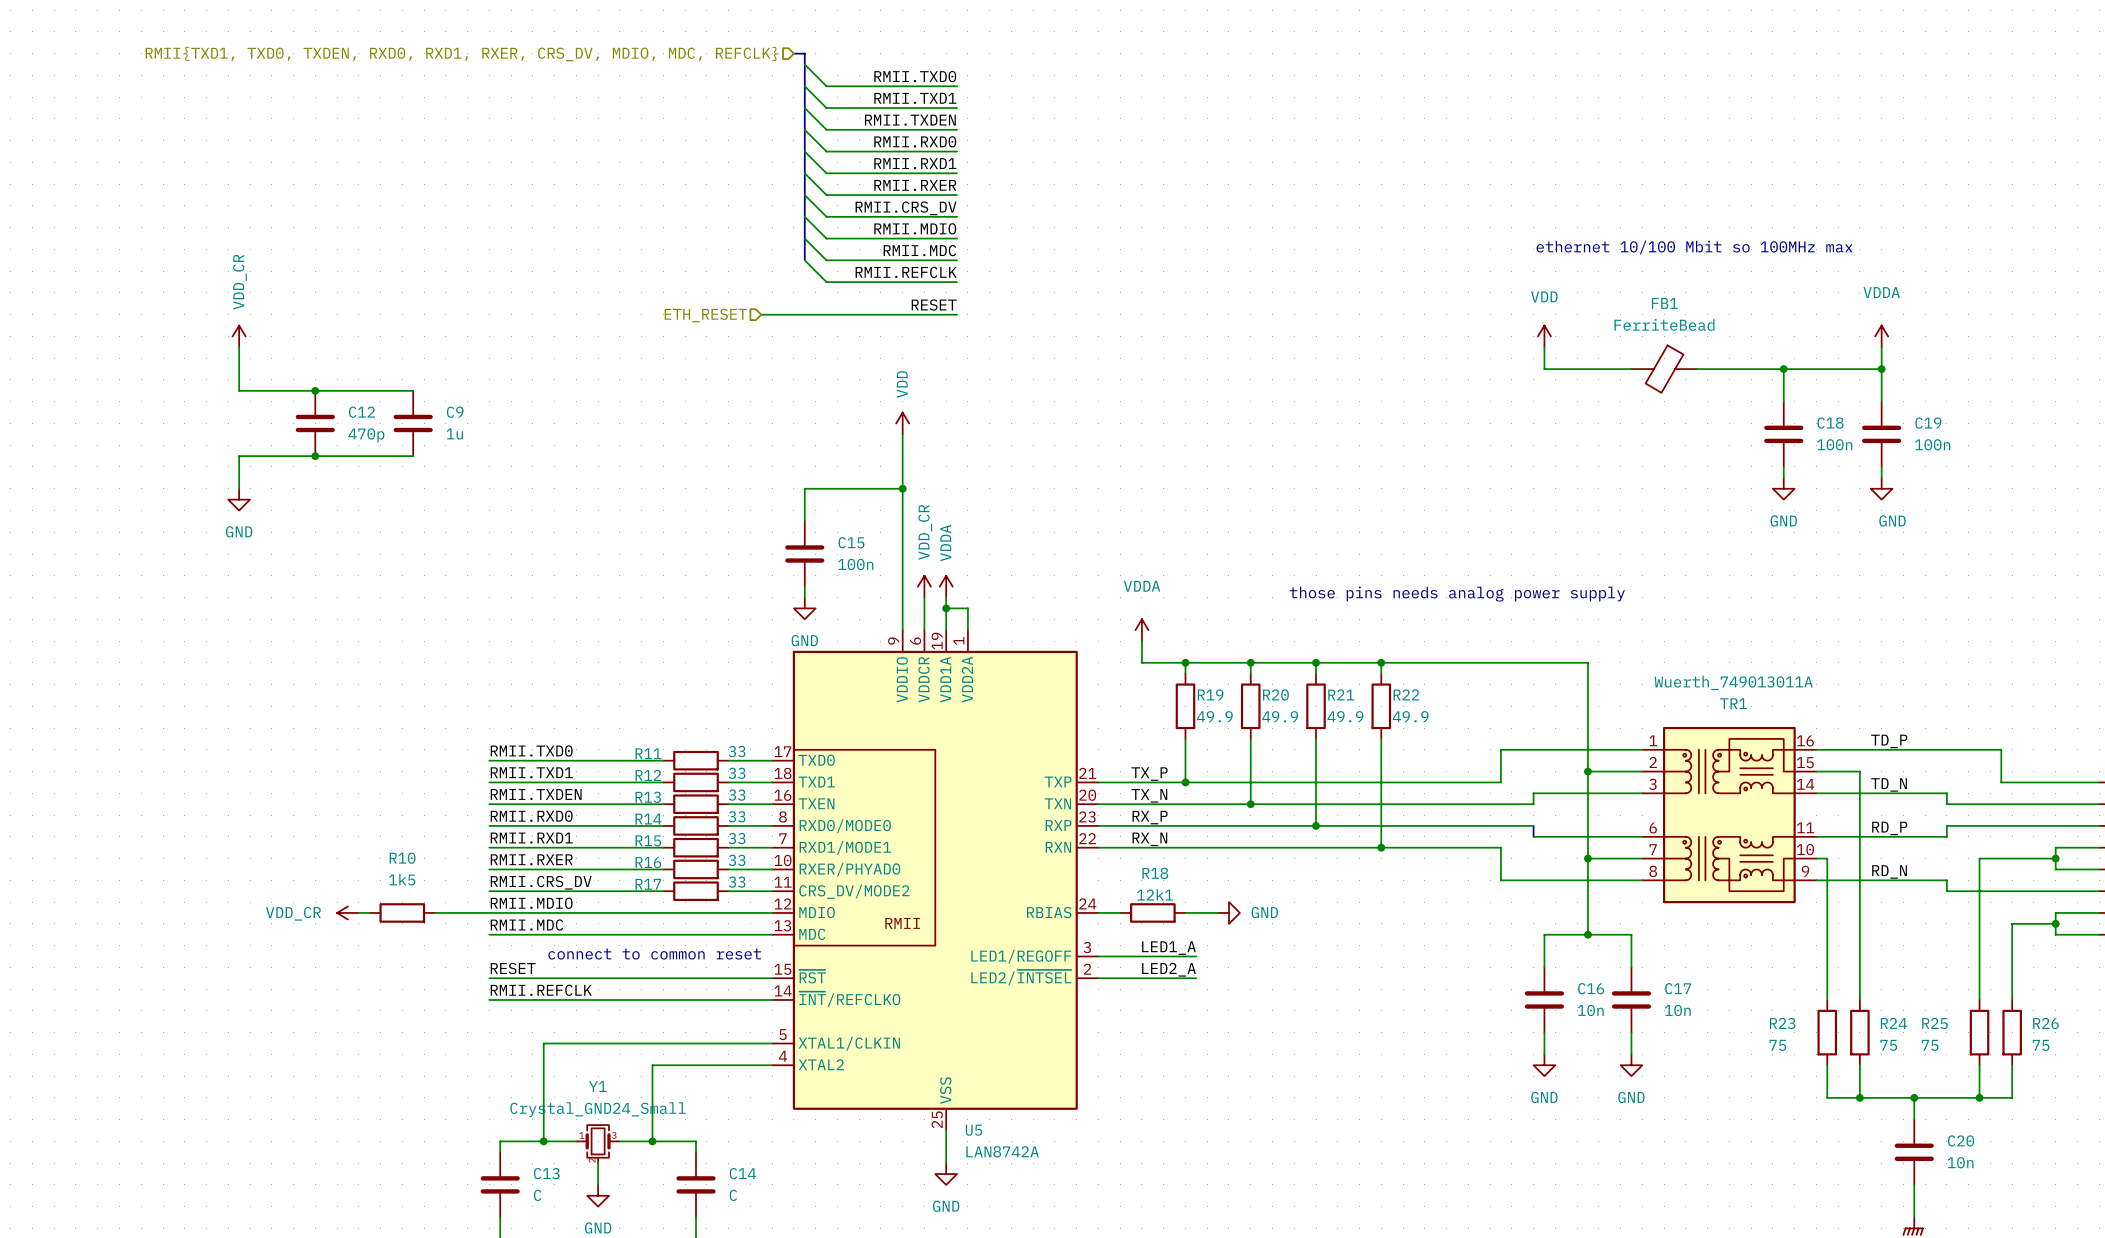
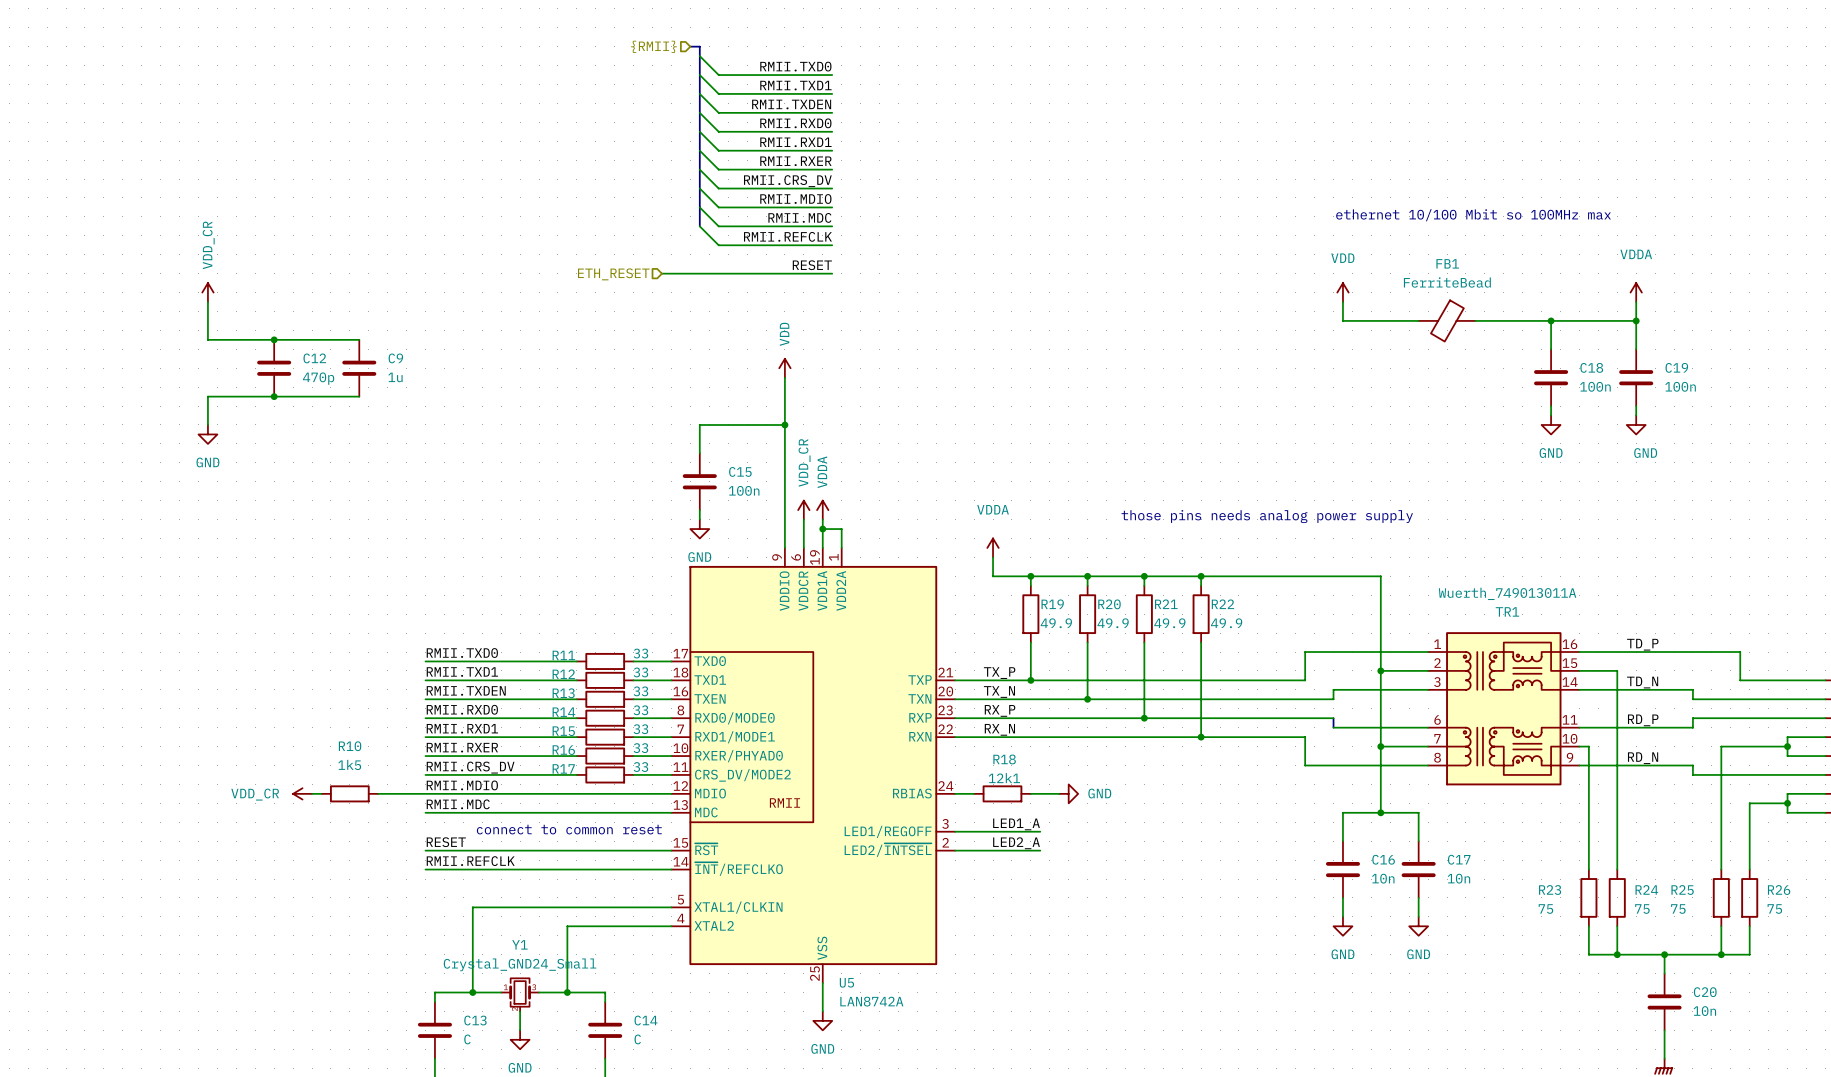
hierarchical label: RMII{TXD1, TXD0, TXDEN, RXD0, RXD1, RXER, CRS_DV, MDIO, MDC, REFCLK} (462, 54) -> {RMII} (653, 46)

